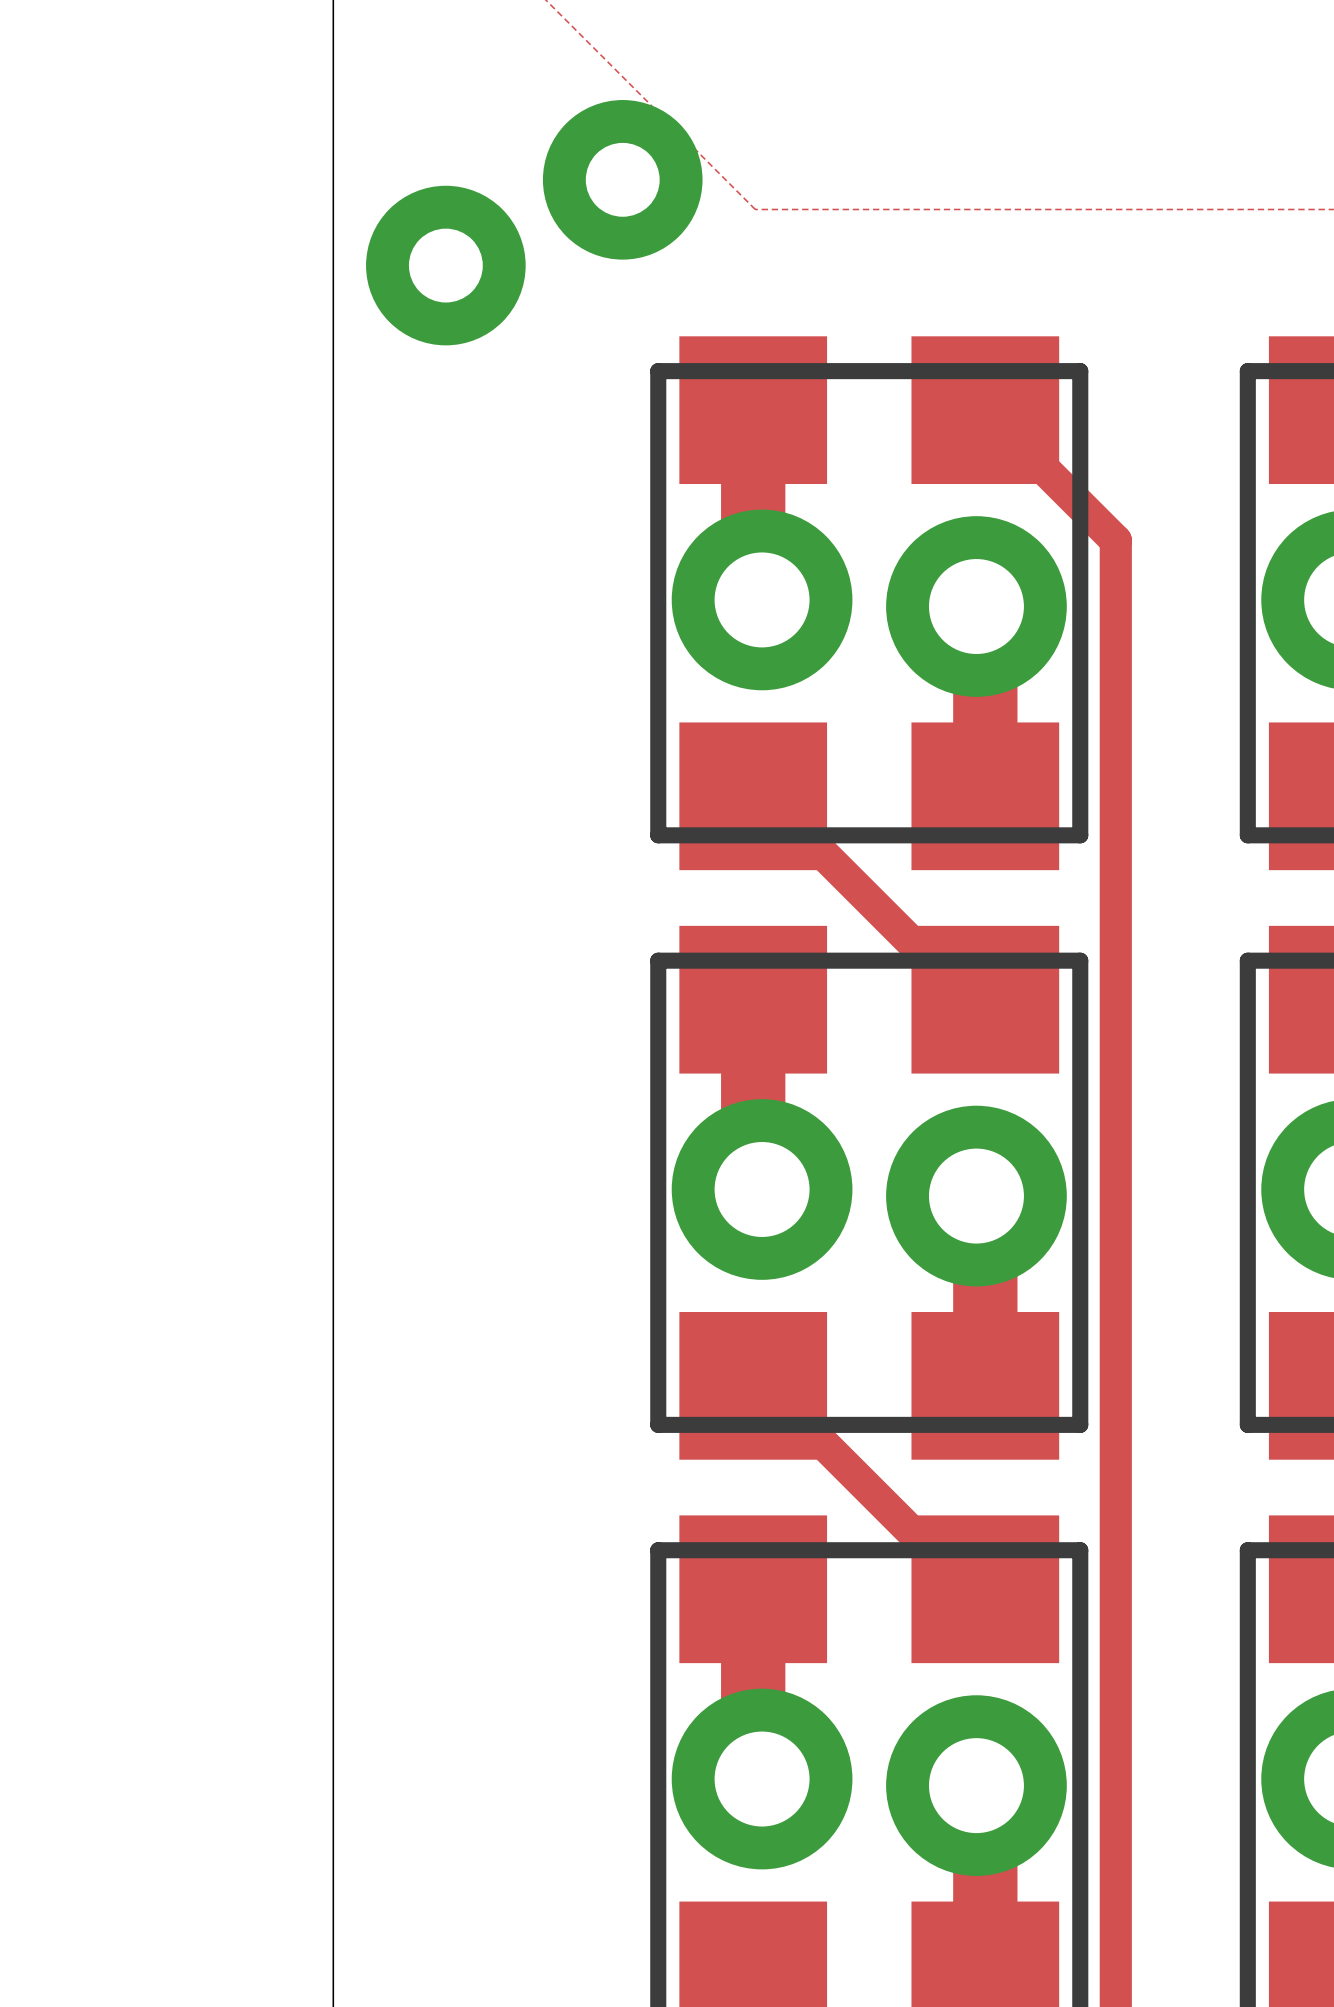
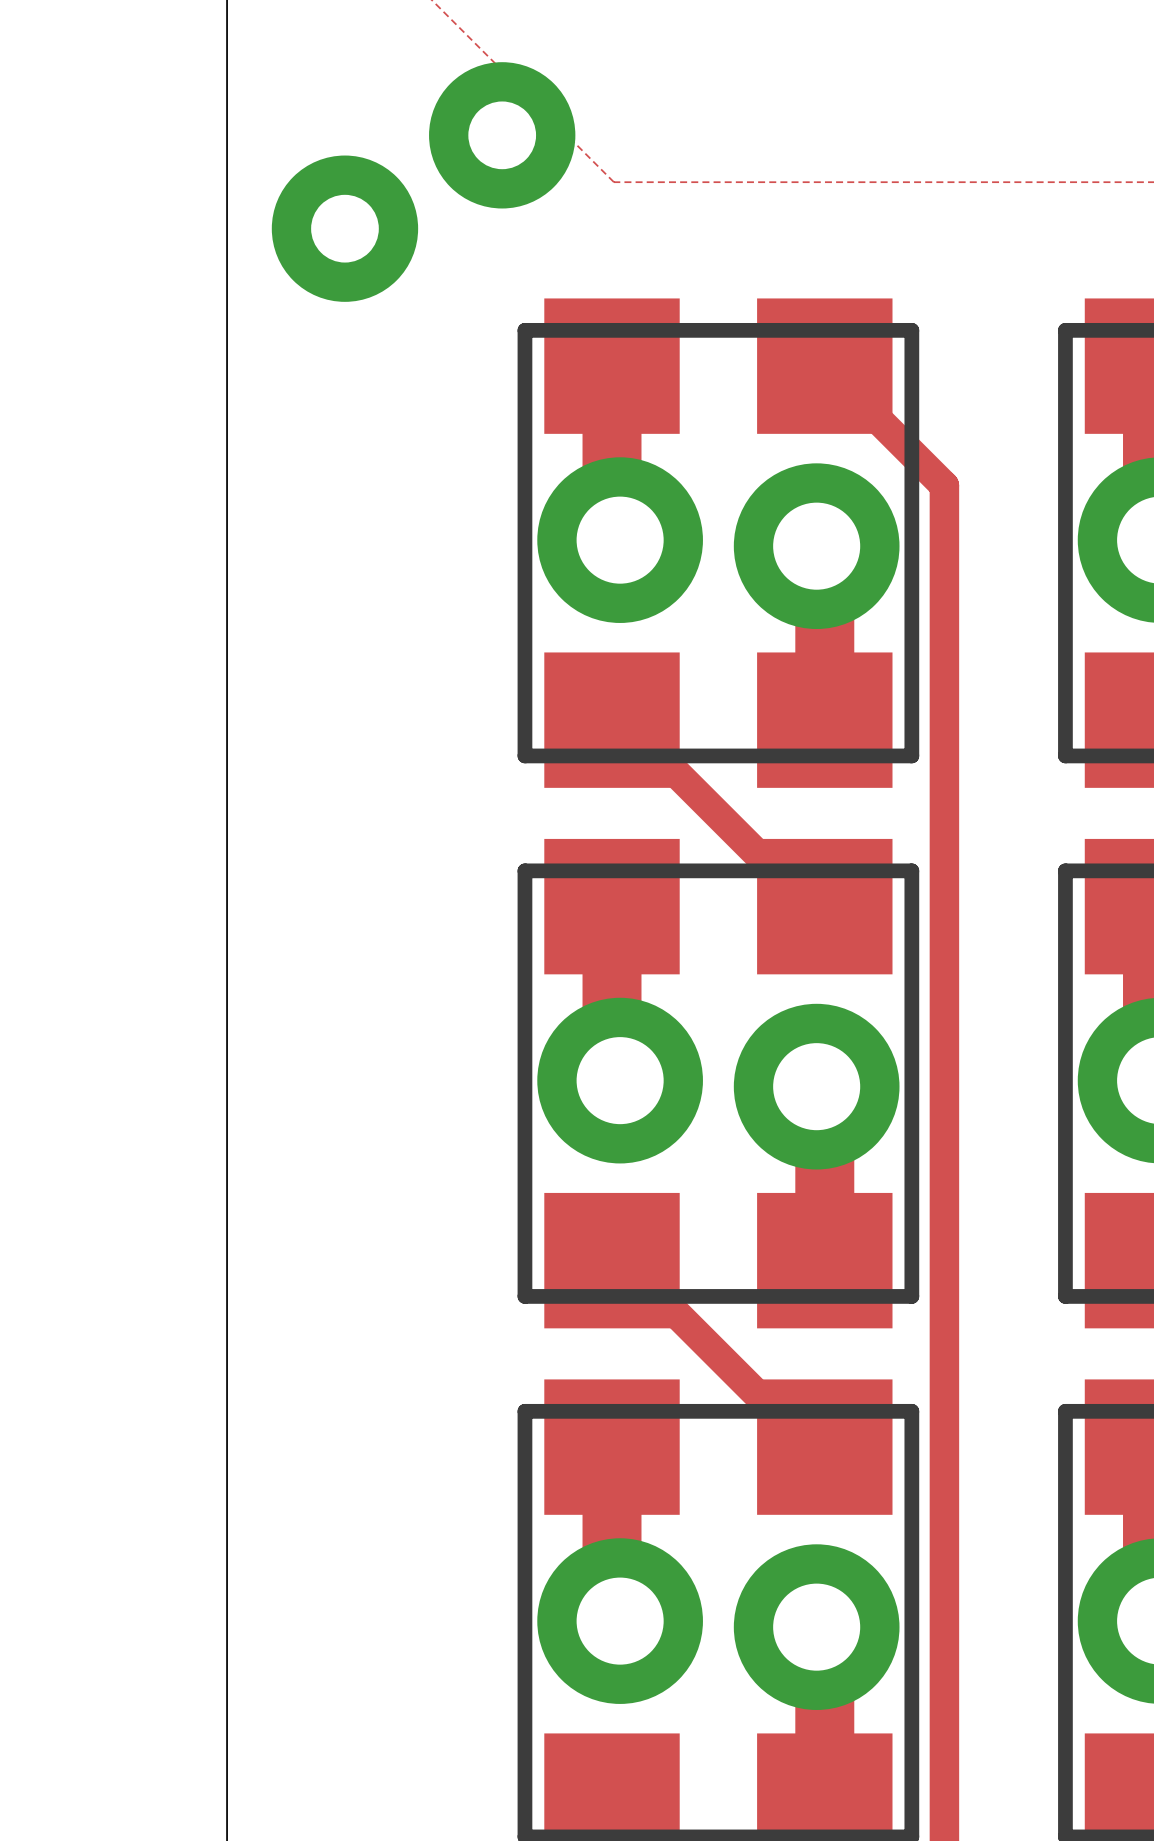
via position: (622, 179) -> (502, 135)
via position: (445, 265) -> (344, 228)

